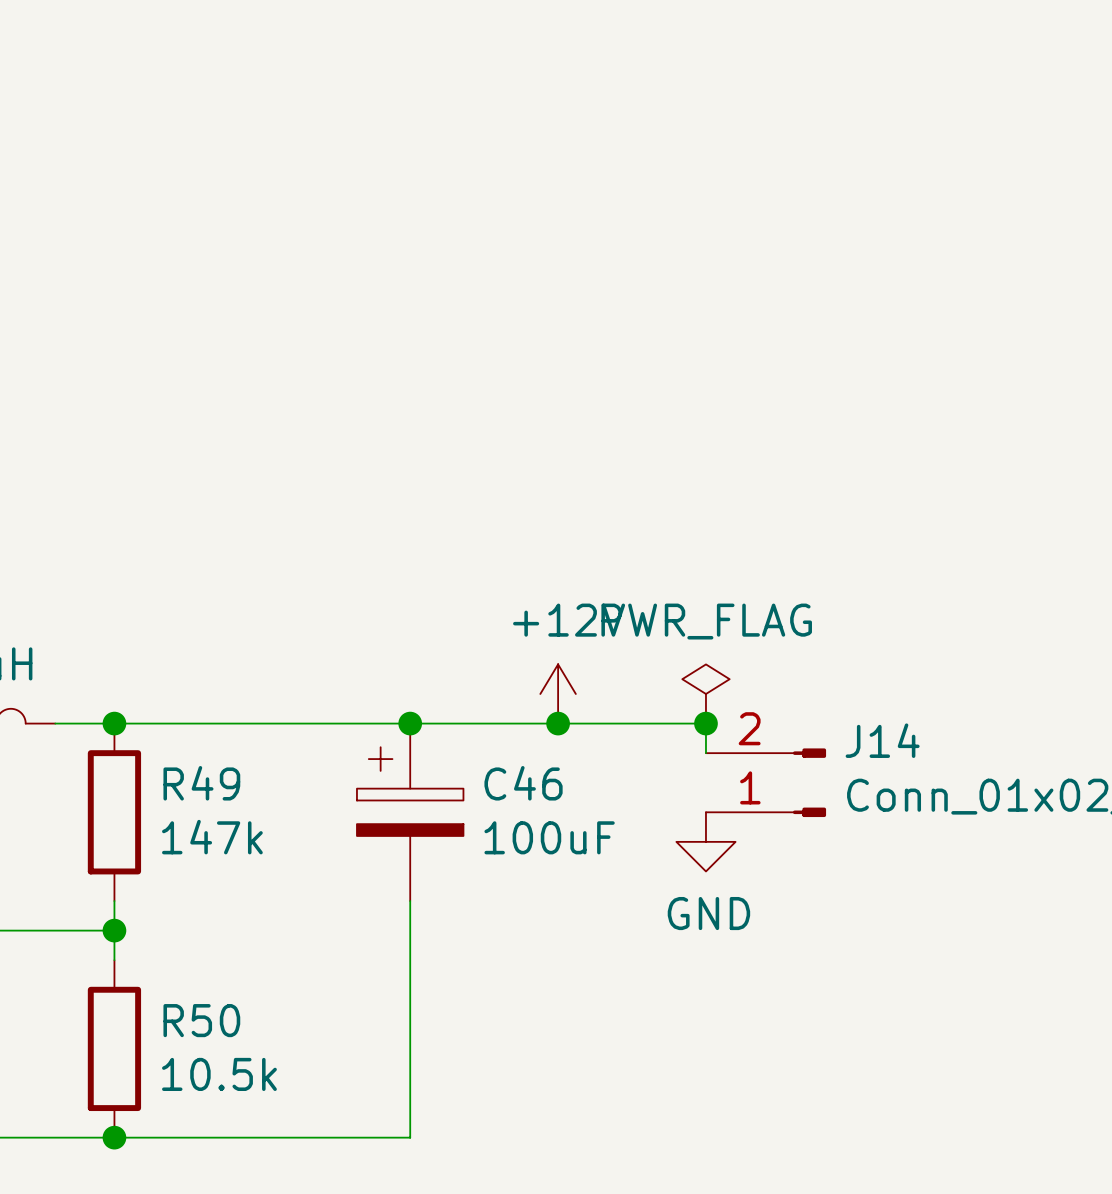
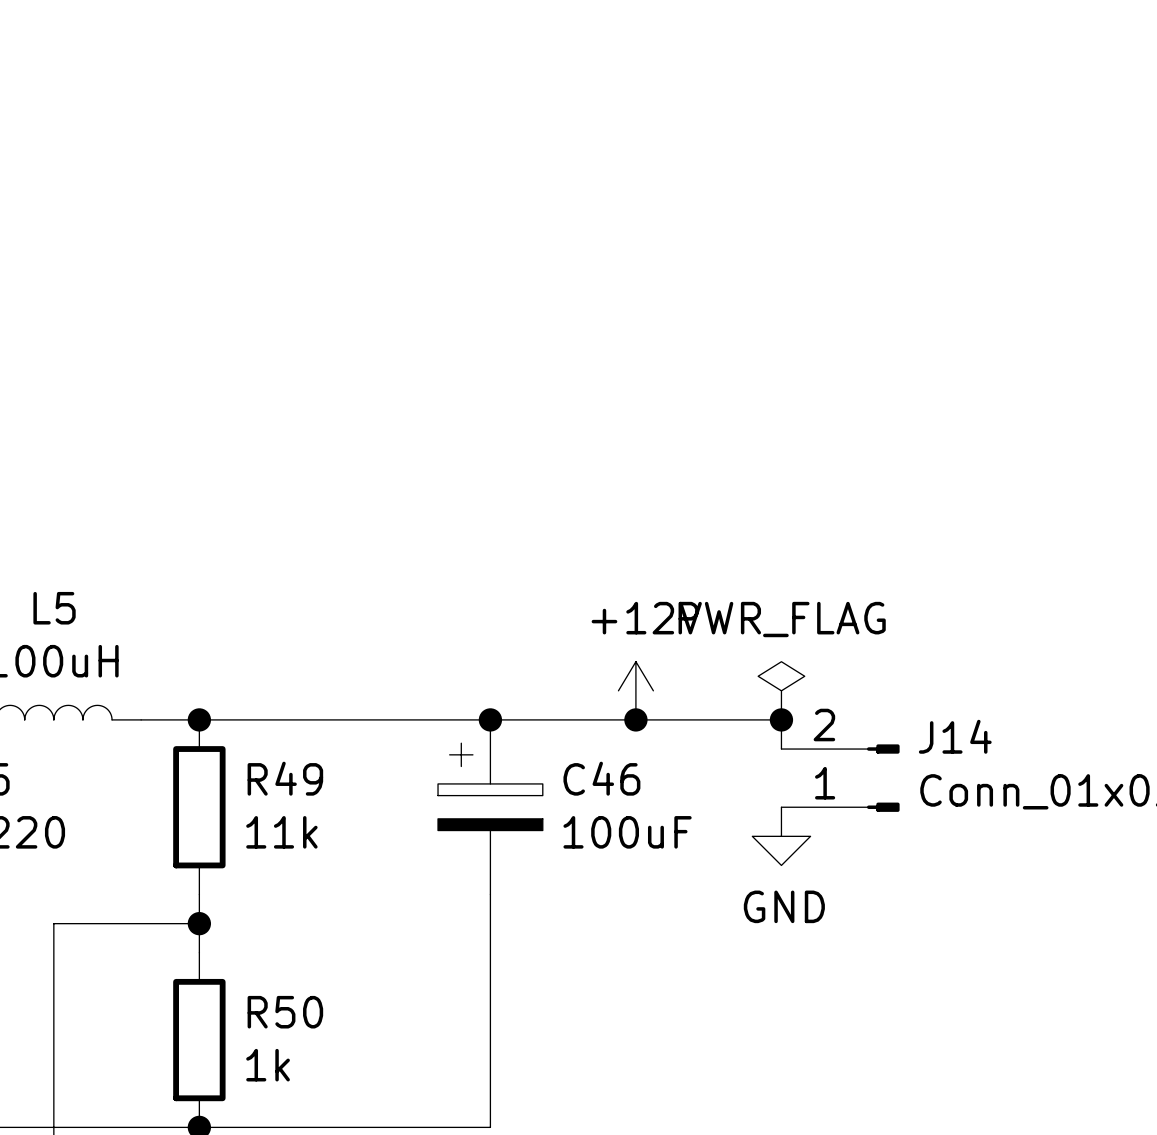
R49 value: 147k (212, 837) -> 11k (281, 832)
R50 value: 10.5k (219, 1074) -> 1k (268, 1065)

